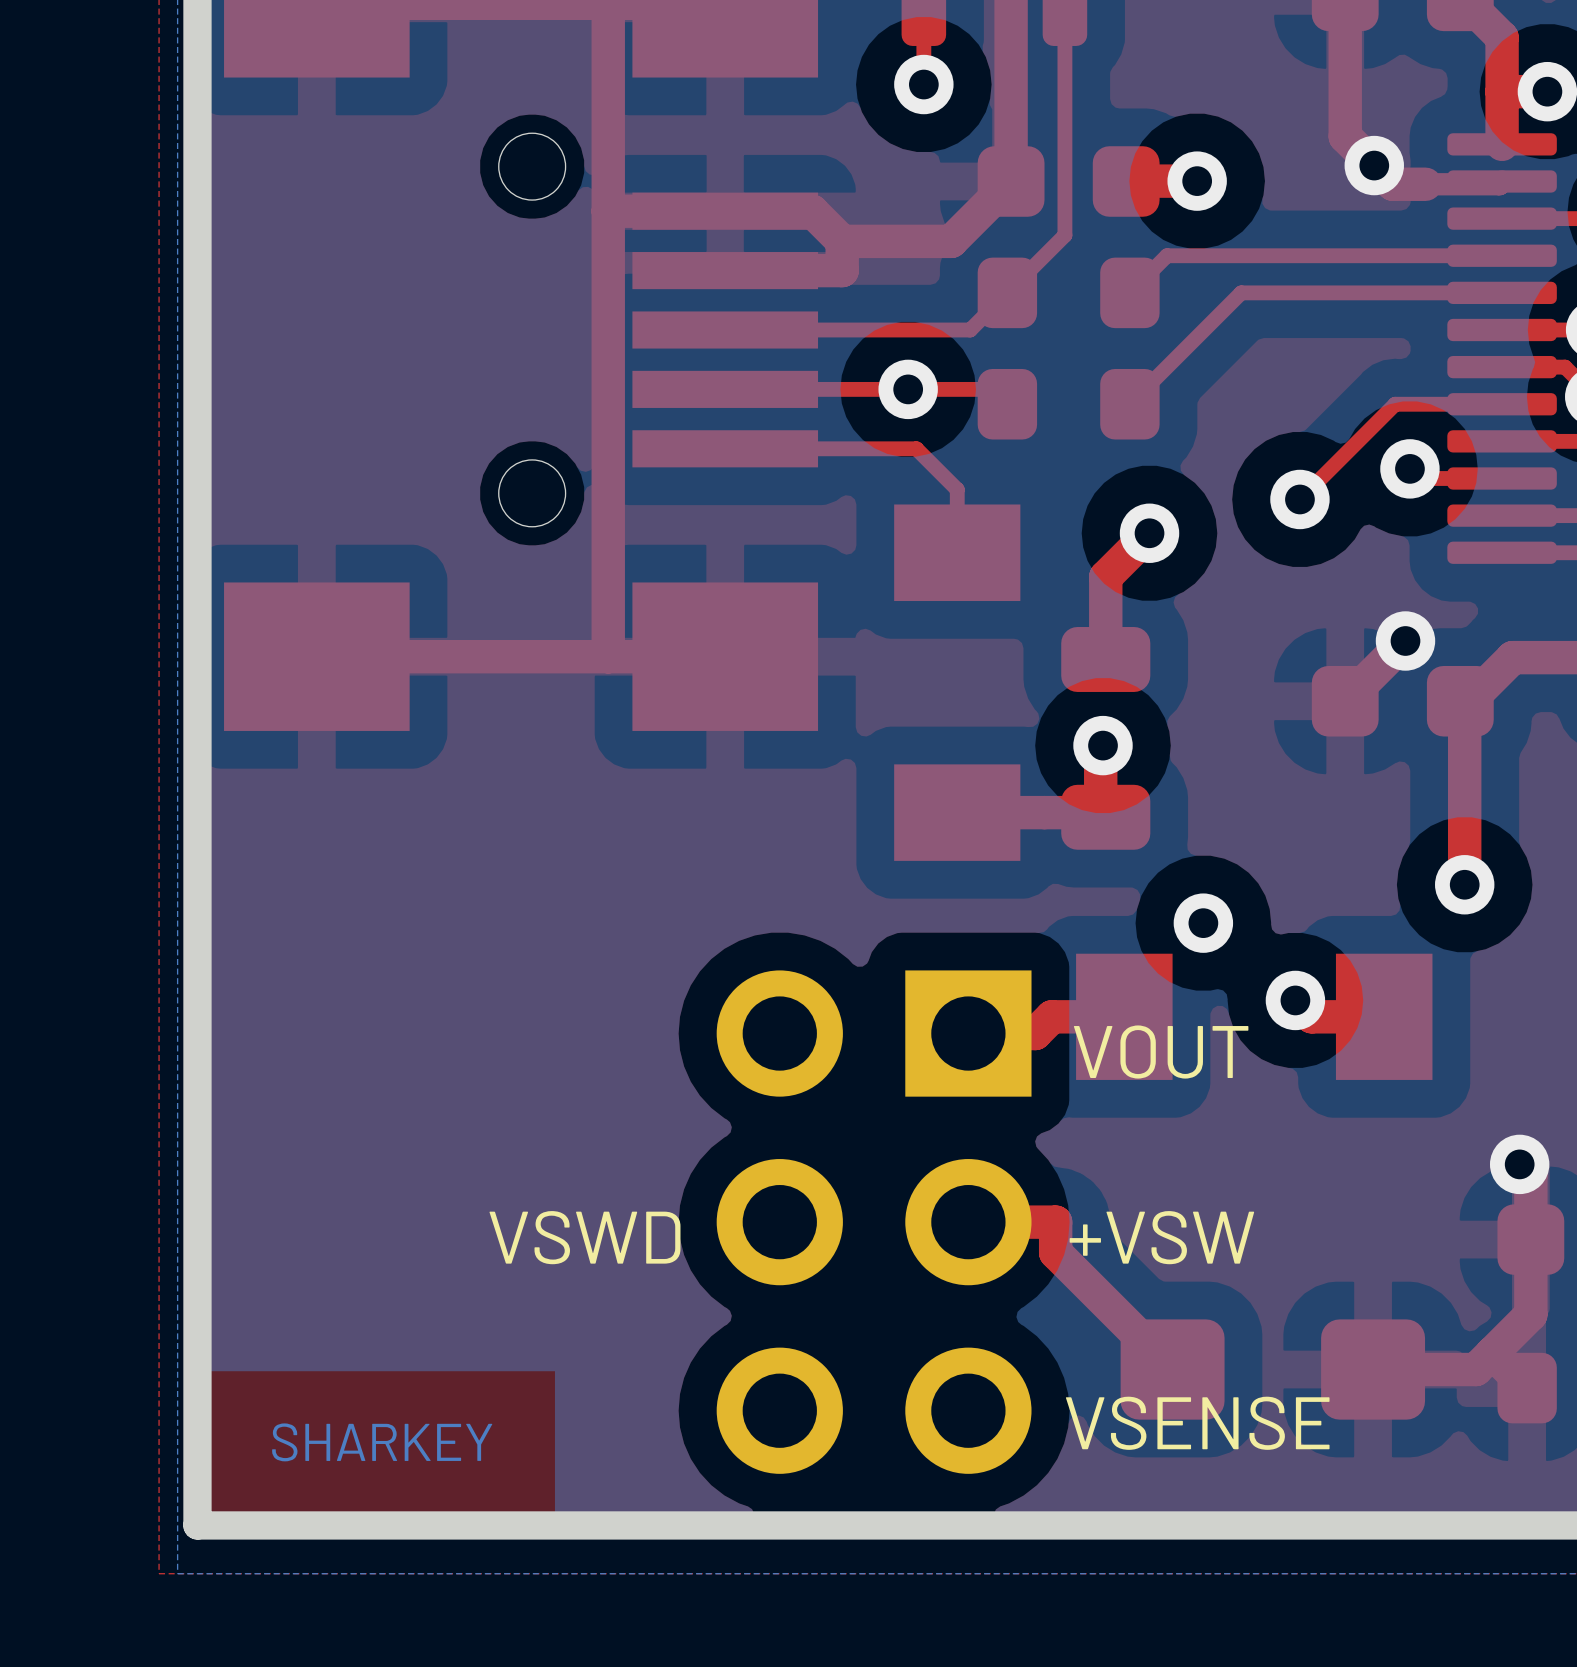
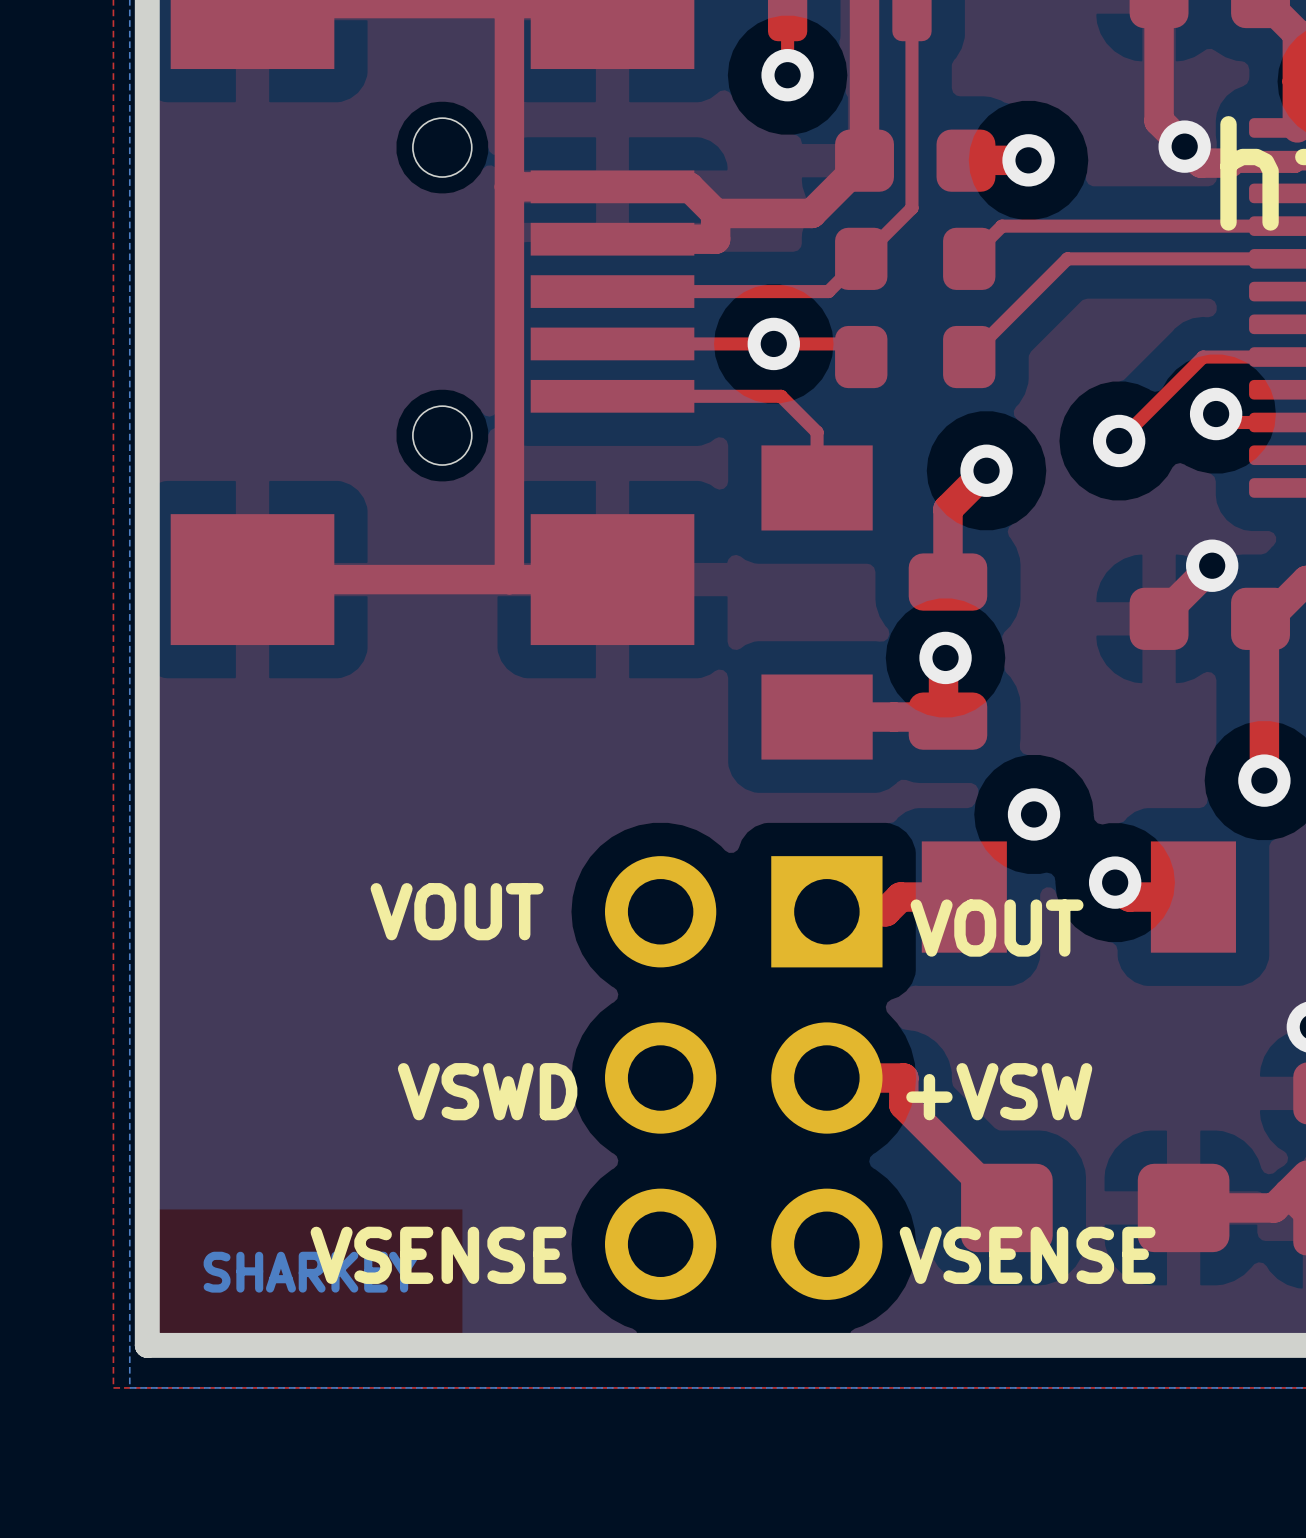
text: none -> VOUT (457, 911)
text: none -> VSENSE (438, 1255)

